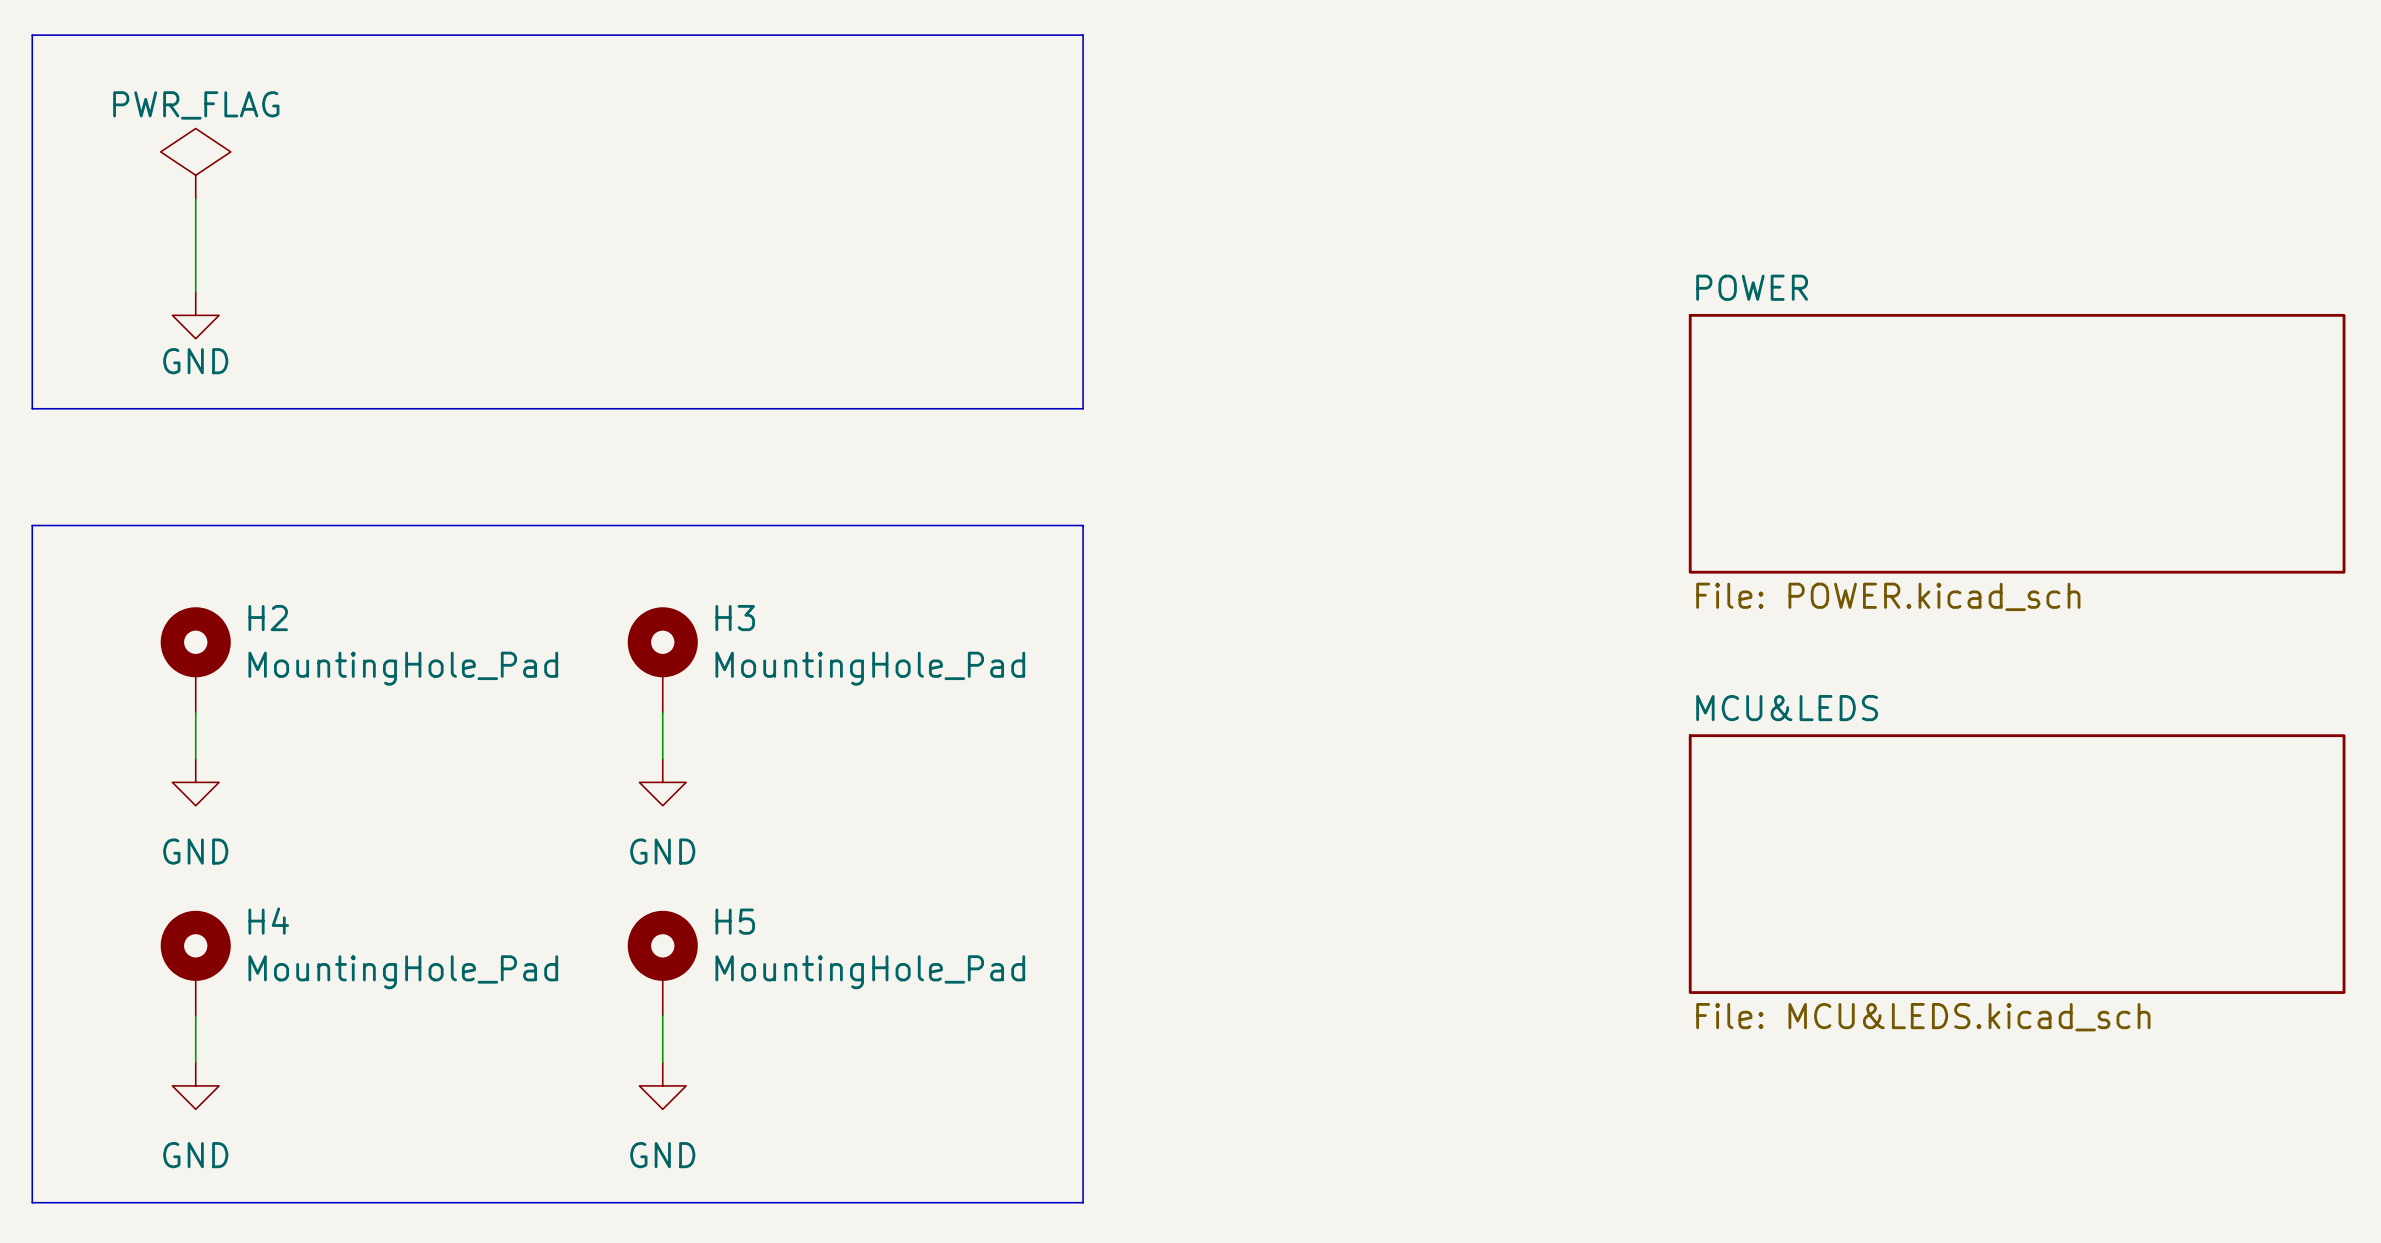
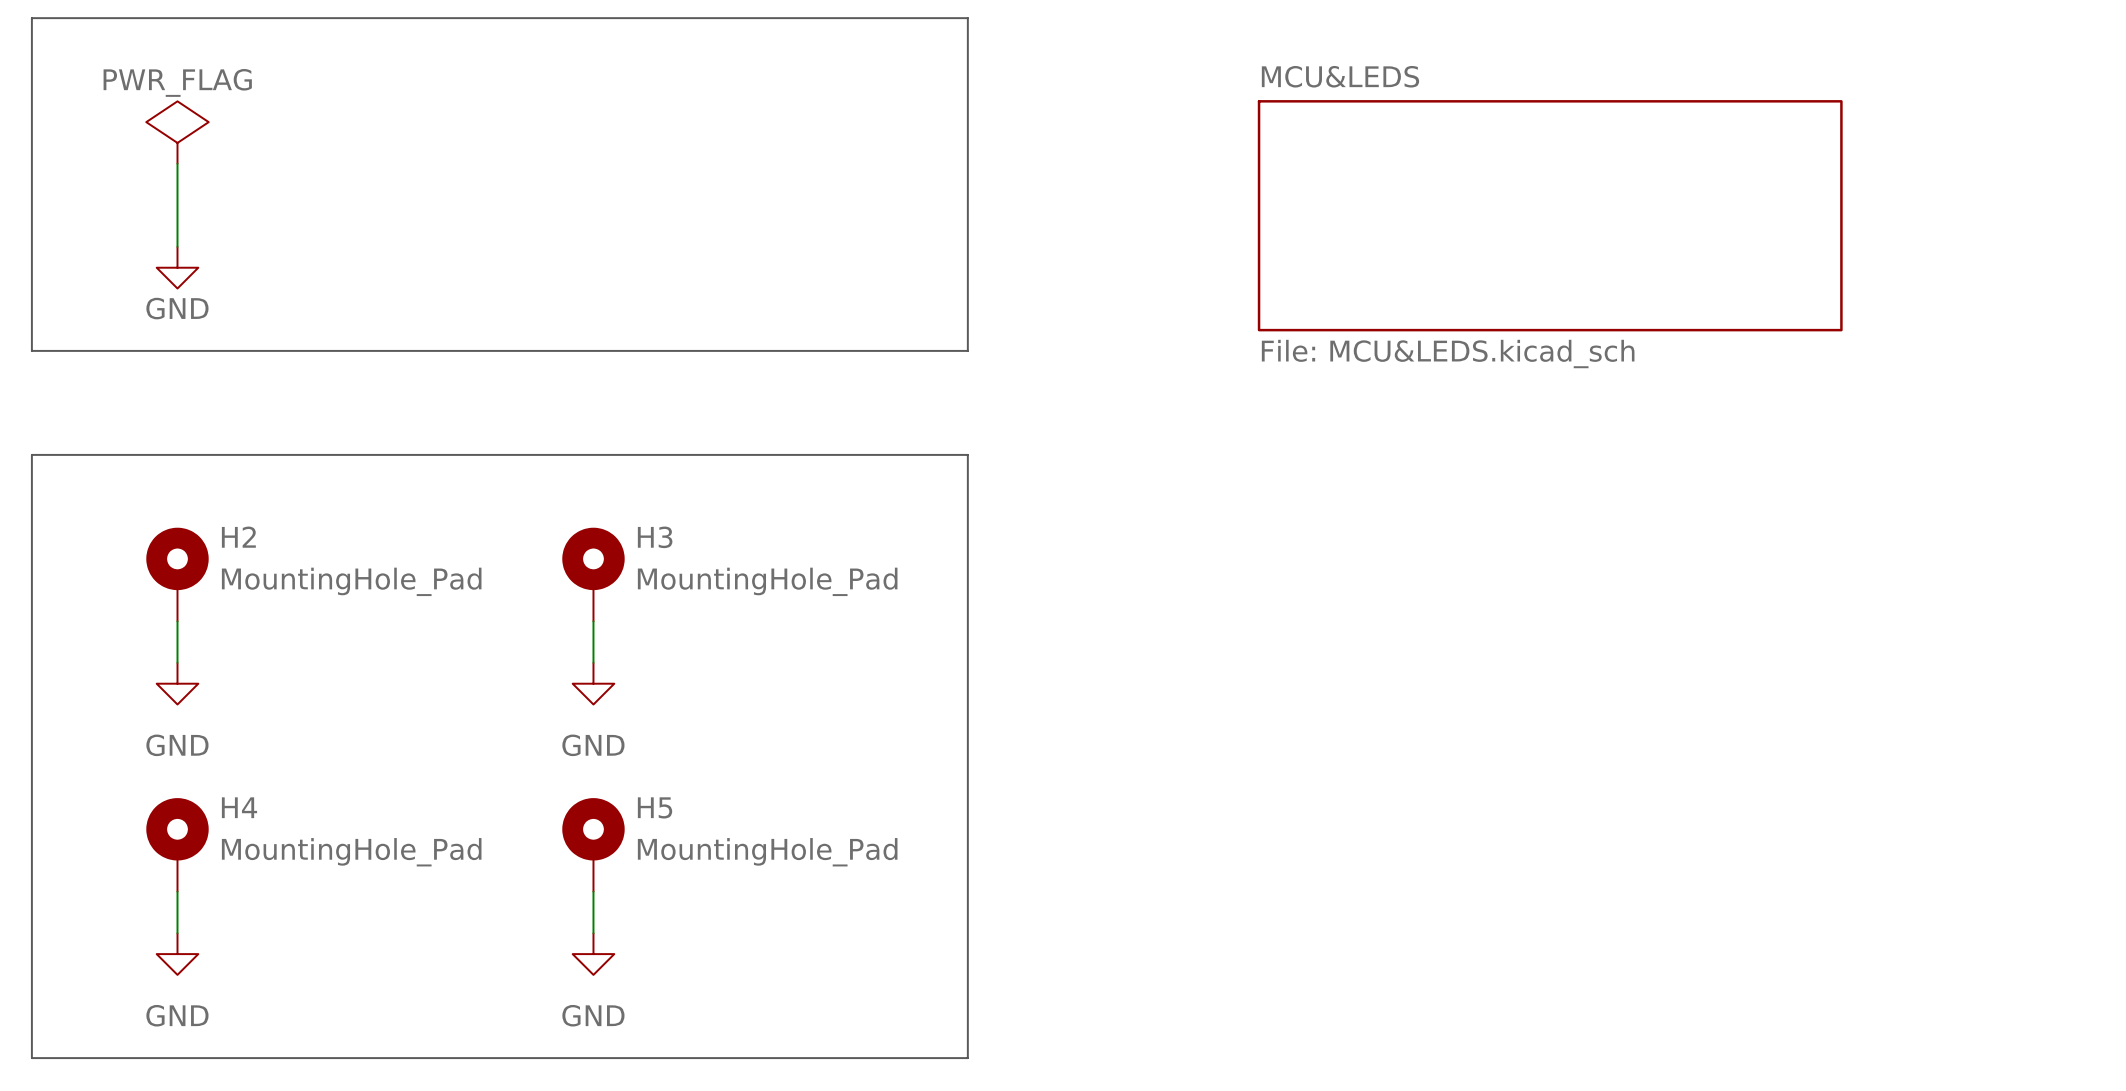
sheet MCU&LEDS: none -> File: MCU&LEDS.kicad_sch (1550, 215)
sheet POWER: File: POWER.kicad_sch (2017, 443) -> none
sheet MCU&LEDS: File: MCU&LEDS.kicad_sch (2017, 864) -> none

